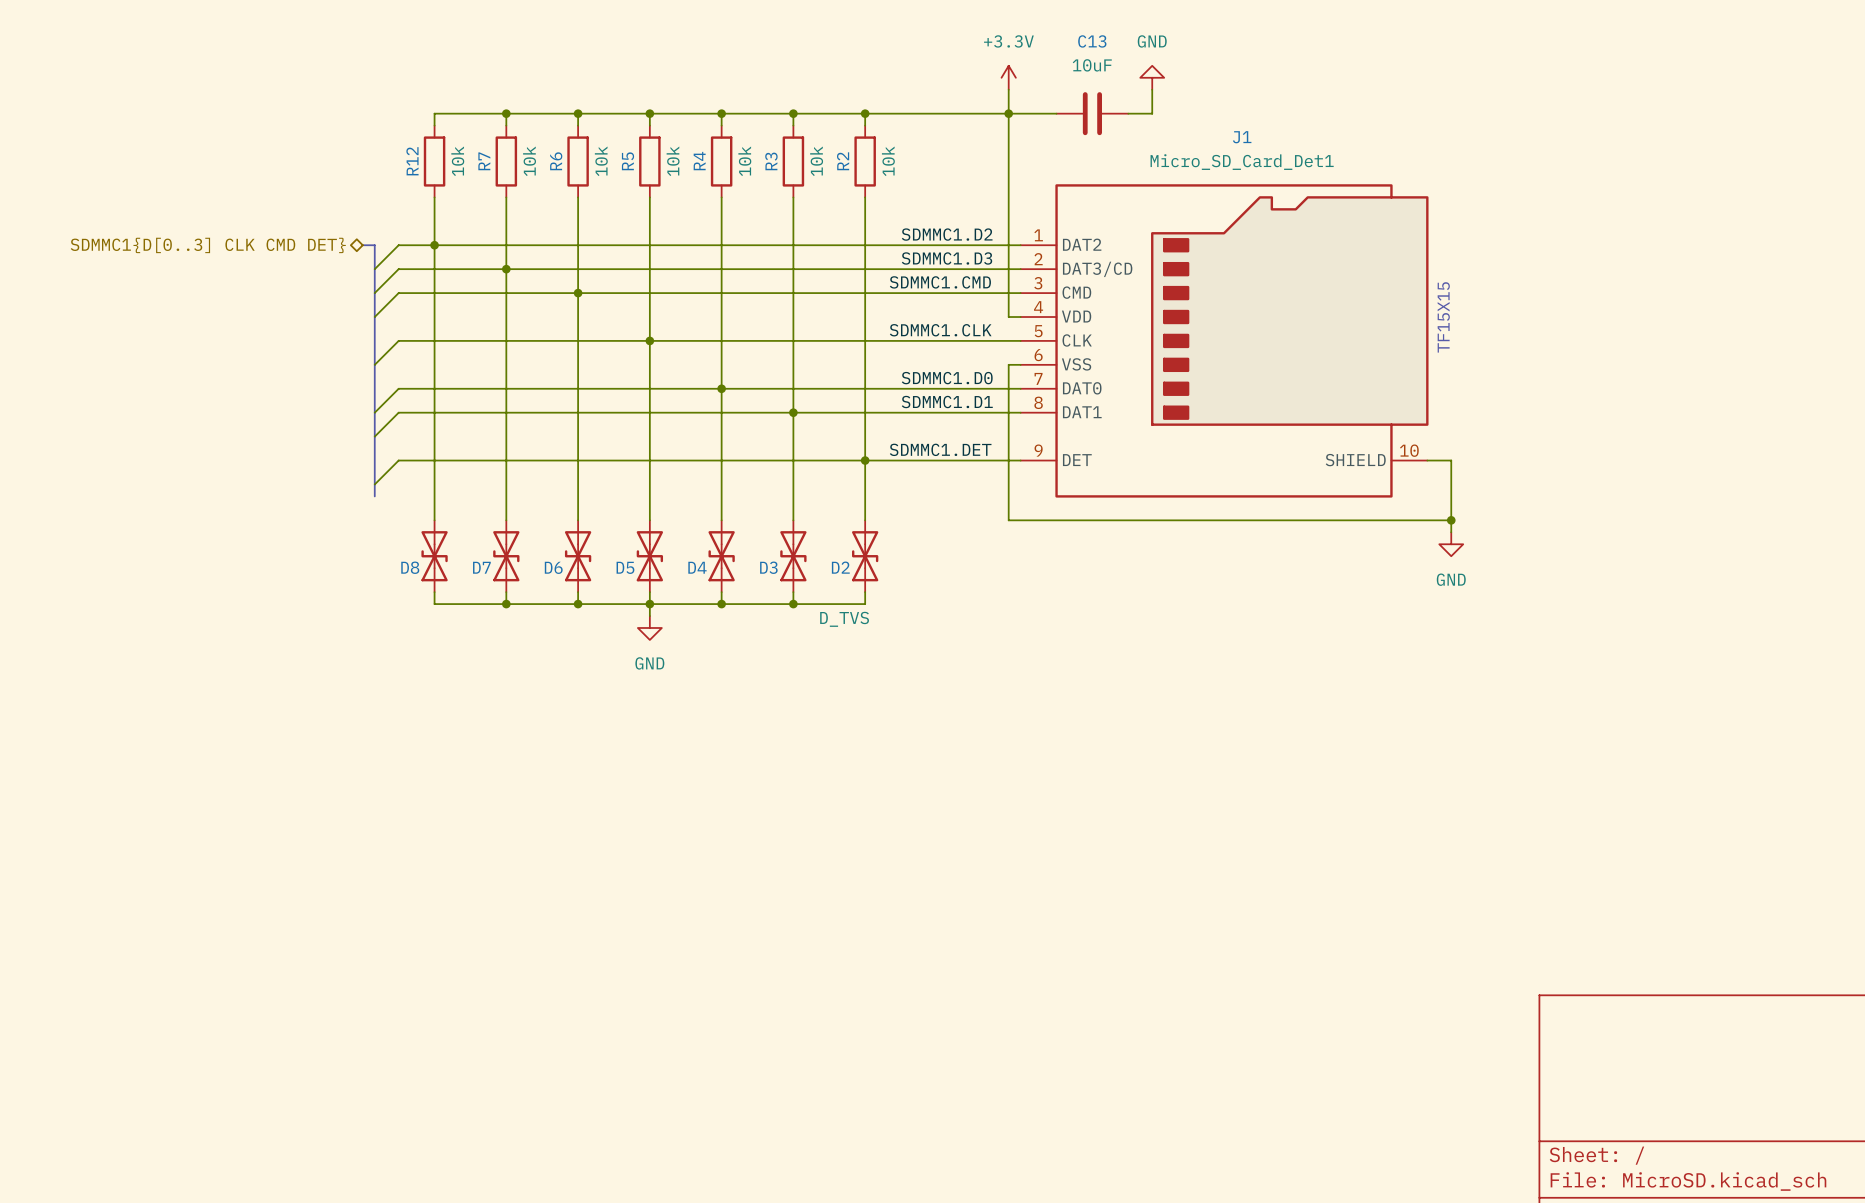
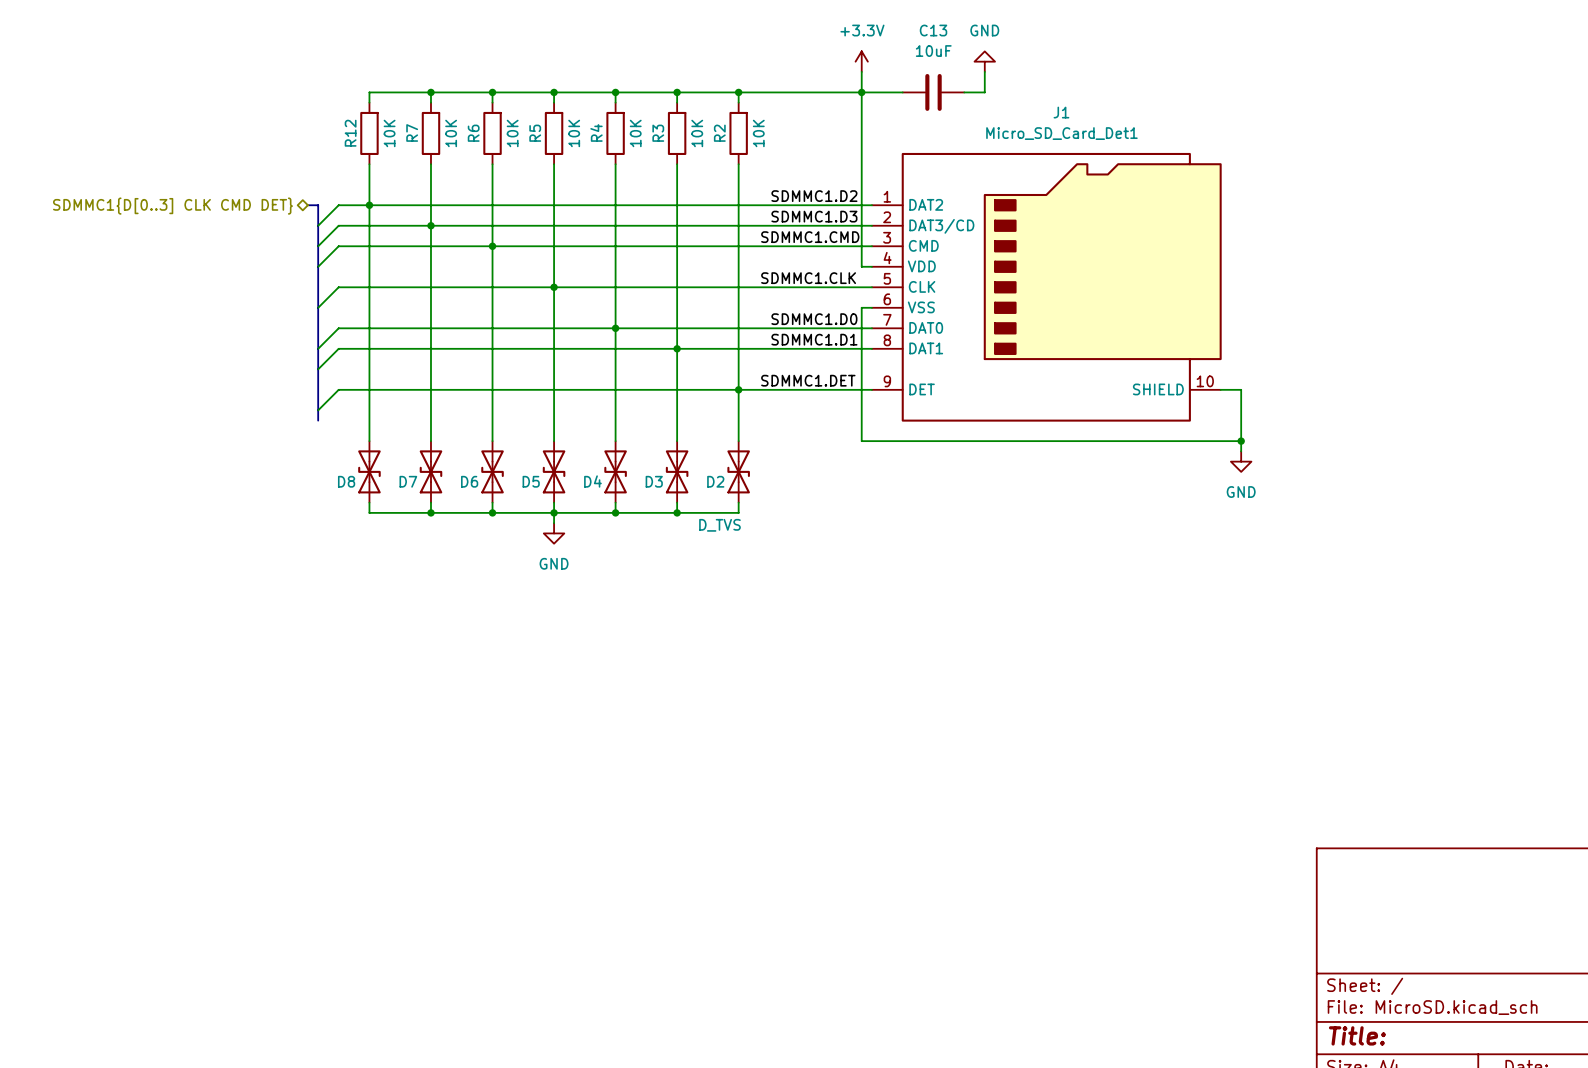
R12 value: 10k (457, 161) -> 10K (389, 133)
R7 value: 10k (529, 161) -> 10K (451, 133)
R6 value: 10k (601, 161) -> 10K (512, 133)
R5 value: 10k (673, 161) -> 10K (574, 133)
R4 value: 10k (744, 161) -> 10K (635, 133)
R3 value: 10k (816, 161) -> 10K (697, 133)
R2 value: 10k (888, 161) -> 10K (758, 133)
text: TF15X15 (1443, 317) -> none

